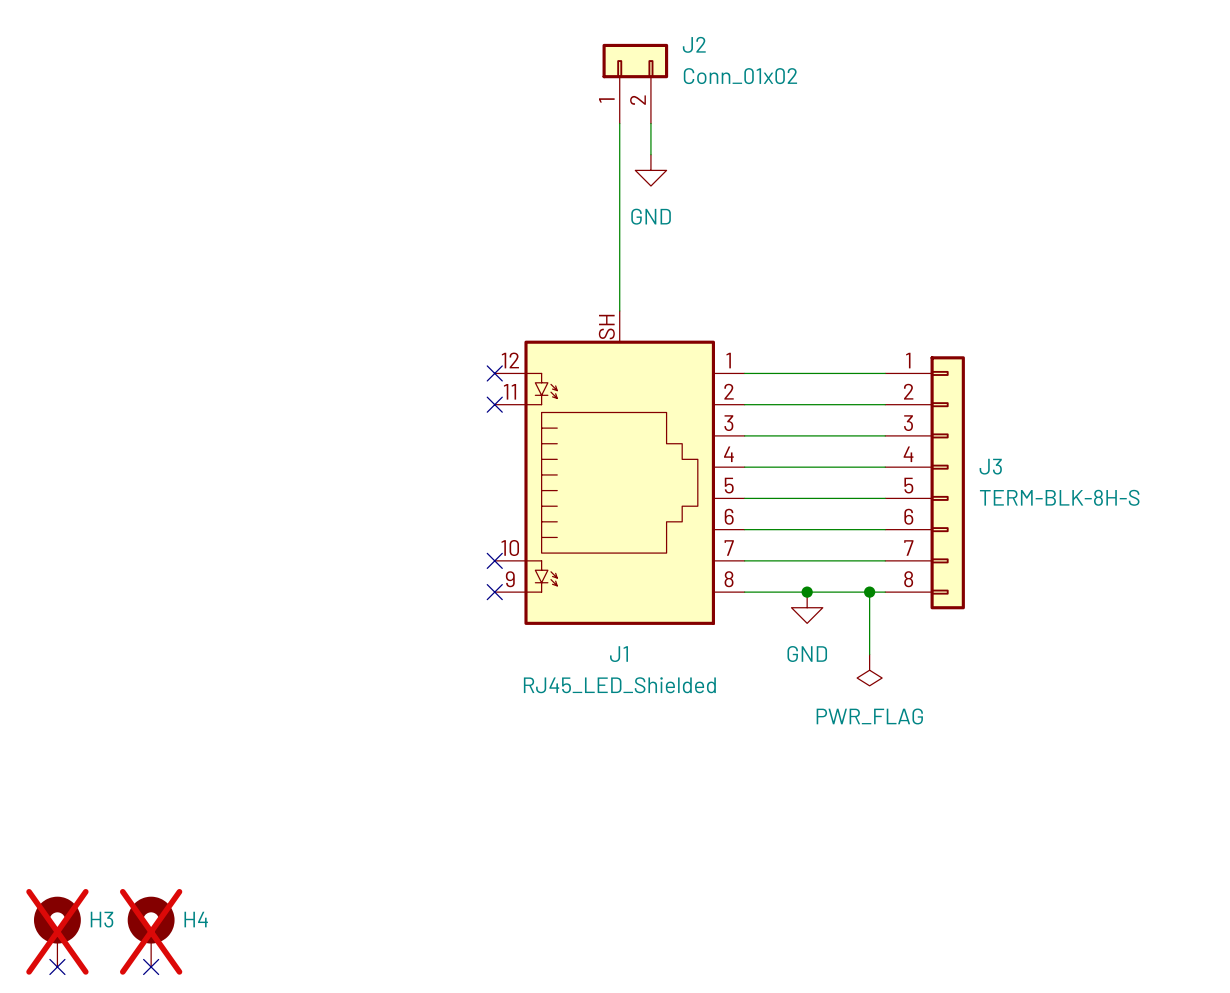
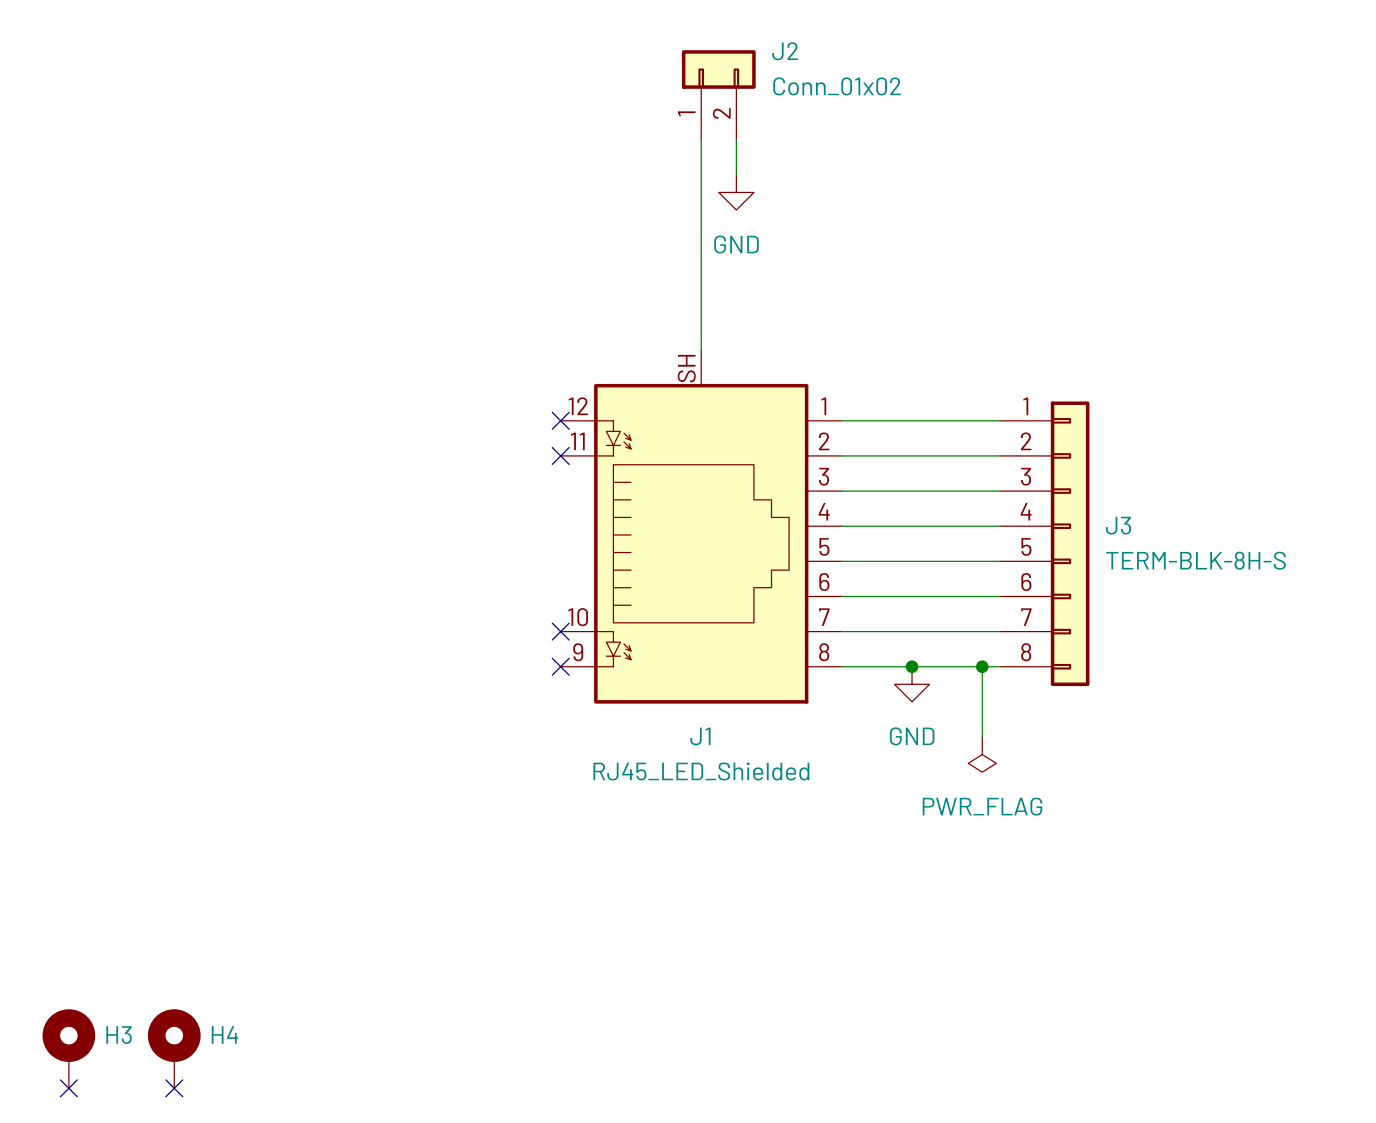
H3 do-not-place cross: (57, 931) -> none
H4 do-not-place cross: (151, 931) -> none

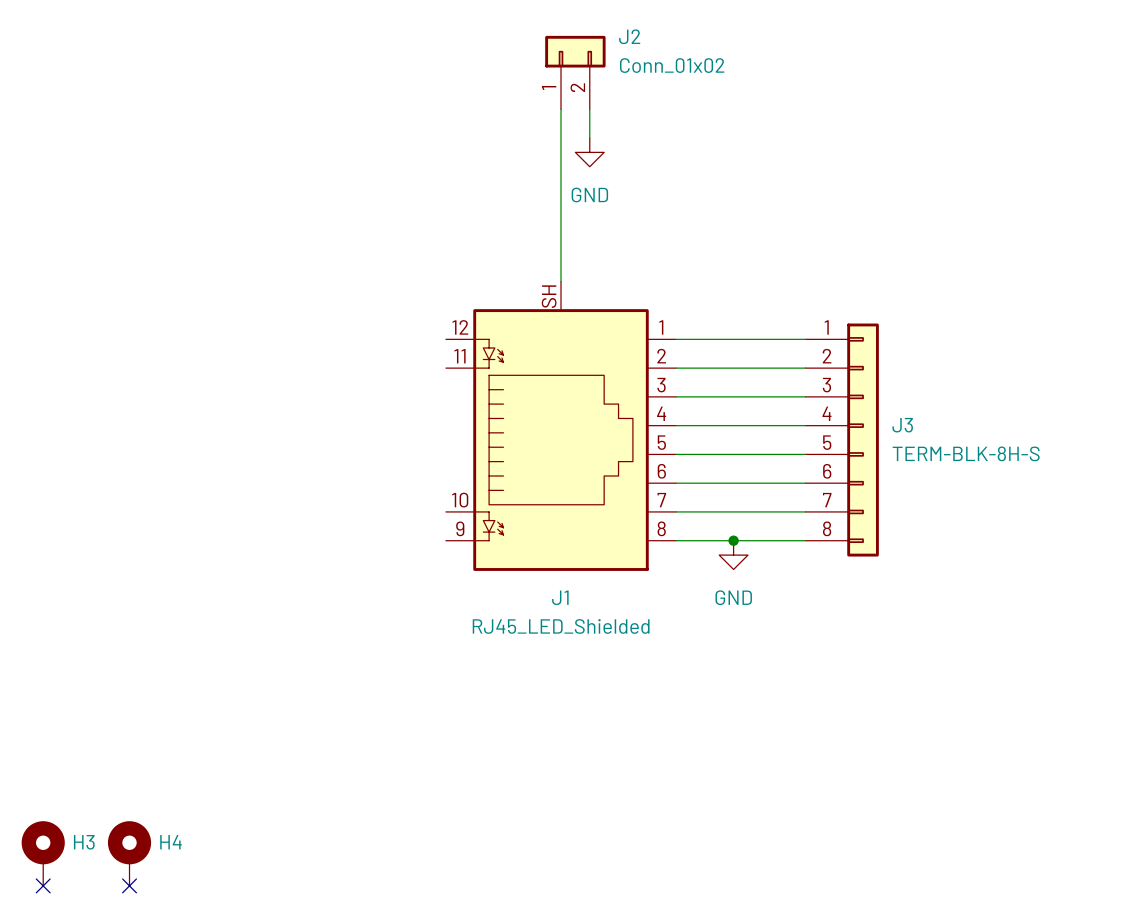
no-connect mark: (560, 420) -> none
no-connect mark: (560, 455) -> none
no-connect mark: (560, 631) -> none
no-connect mark: (560, 666) -> none
wire: (982, 666) (982, 737) -> none
junction: (982, 666) -> none
power symbol: PWR_FLAG (982, 754) -> none

